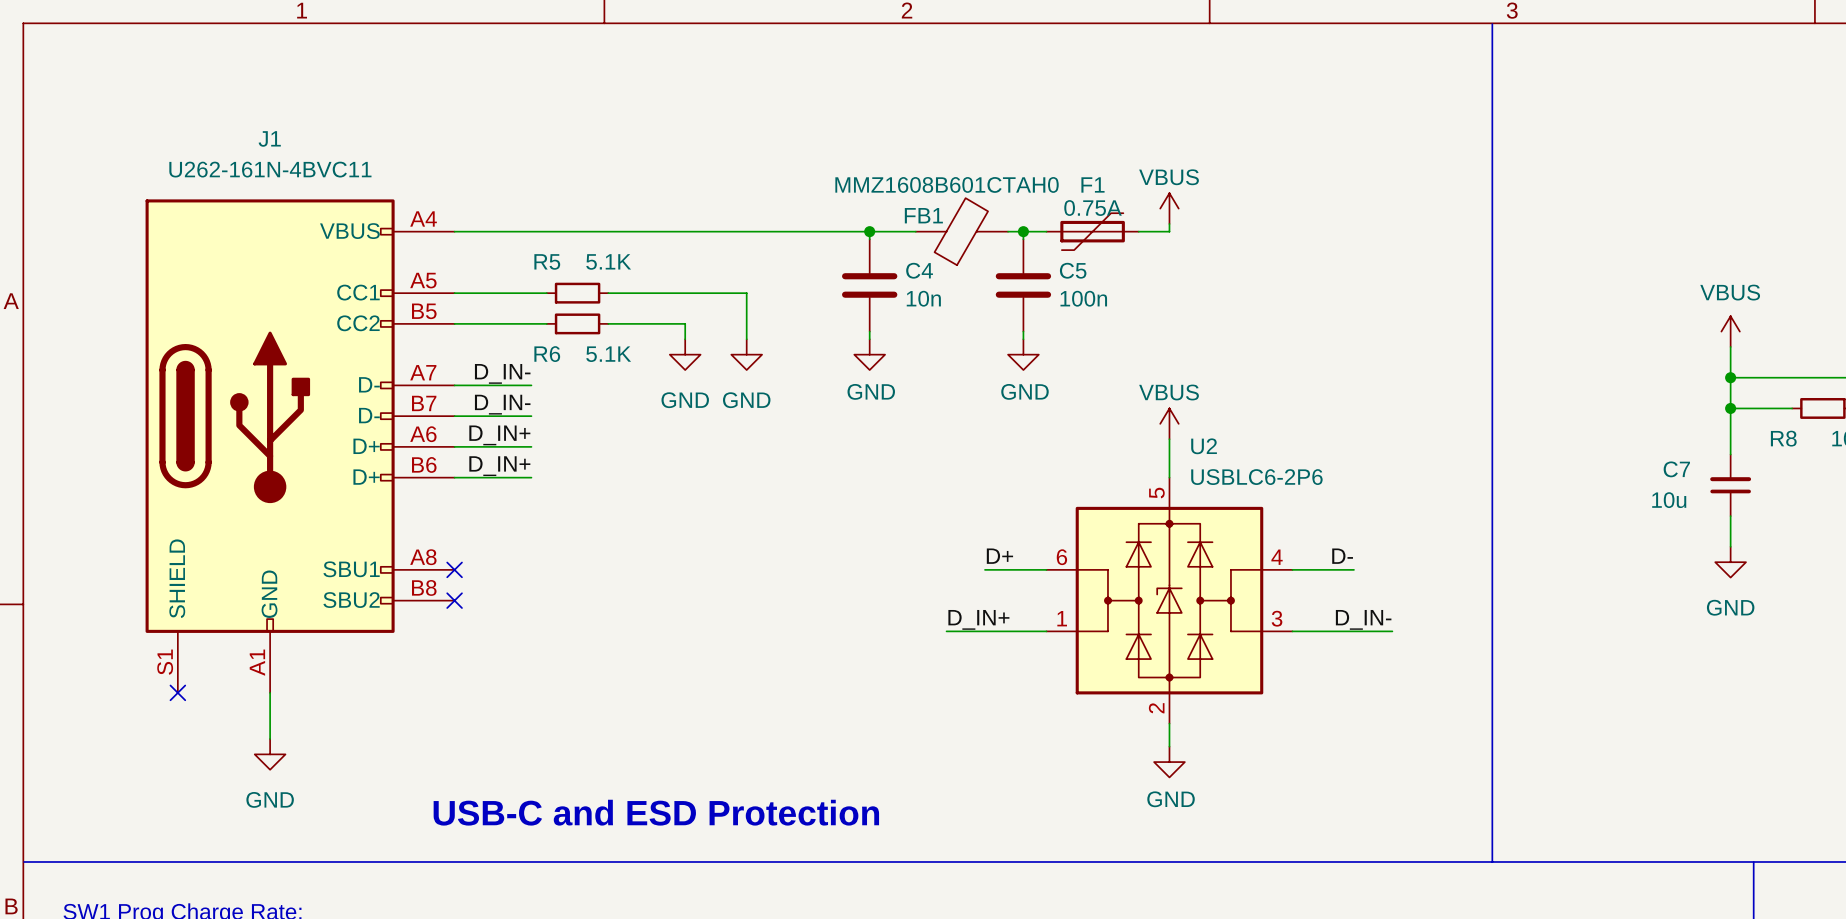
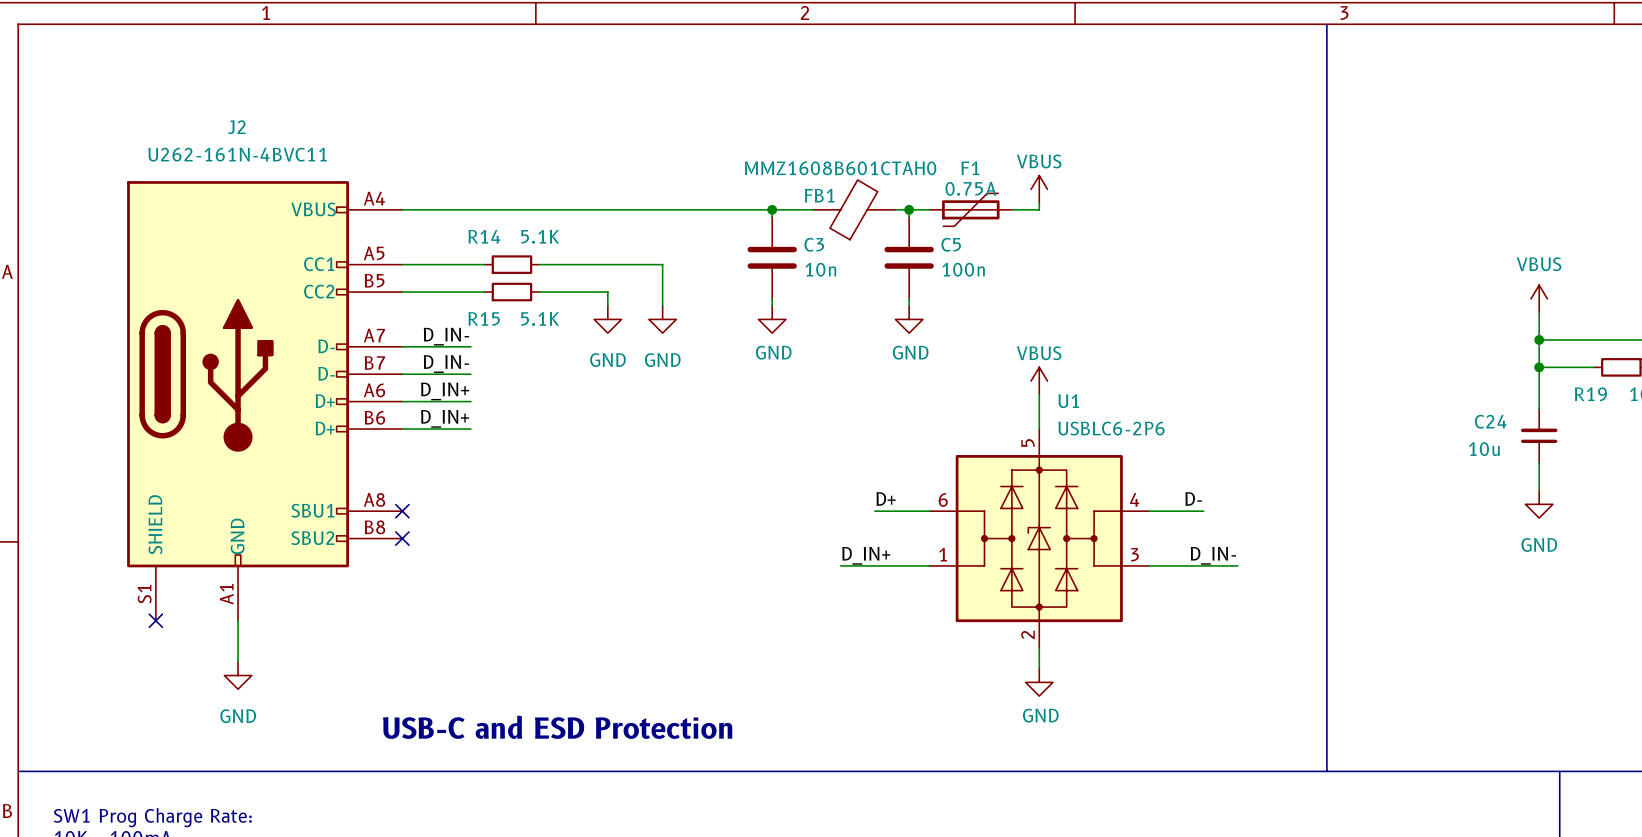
J1 name: J1 (269, 138) -> J2 (236, 127)
R5 name: R5 (547, 261) -> R14 (484, 236)
C4 name: C4 (919, 270) -> C3 (814, 244)
R6 name: R6 (547, 354) -> R15 (484, 318)
R8 name: R8 (1783, 438) -> R19 (1590, 394)
U2 name: U2 (1204, 446) -> U1 (1068, 401)
C7 name: C7 (1676, 469) -> C24 (1490, 421)

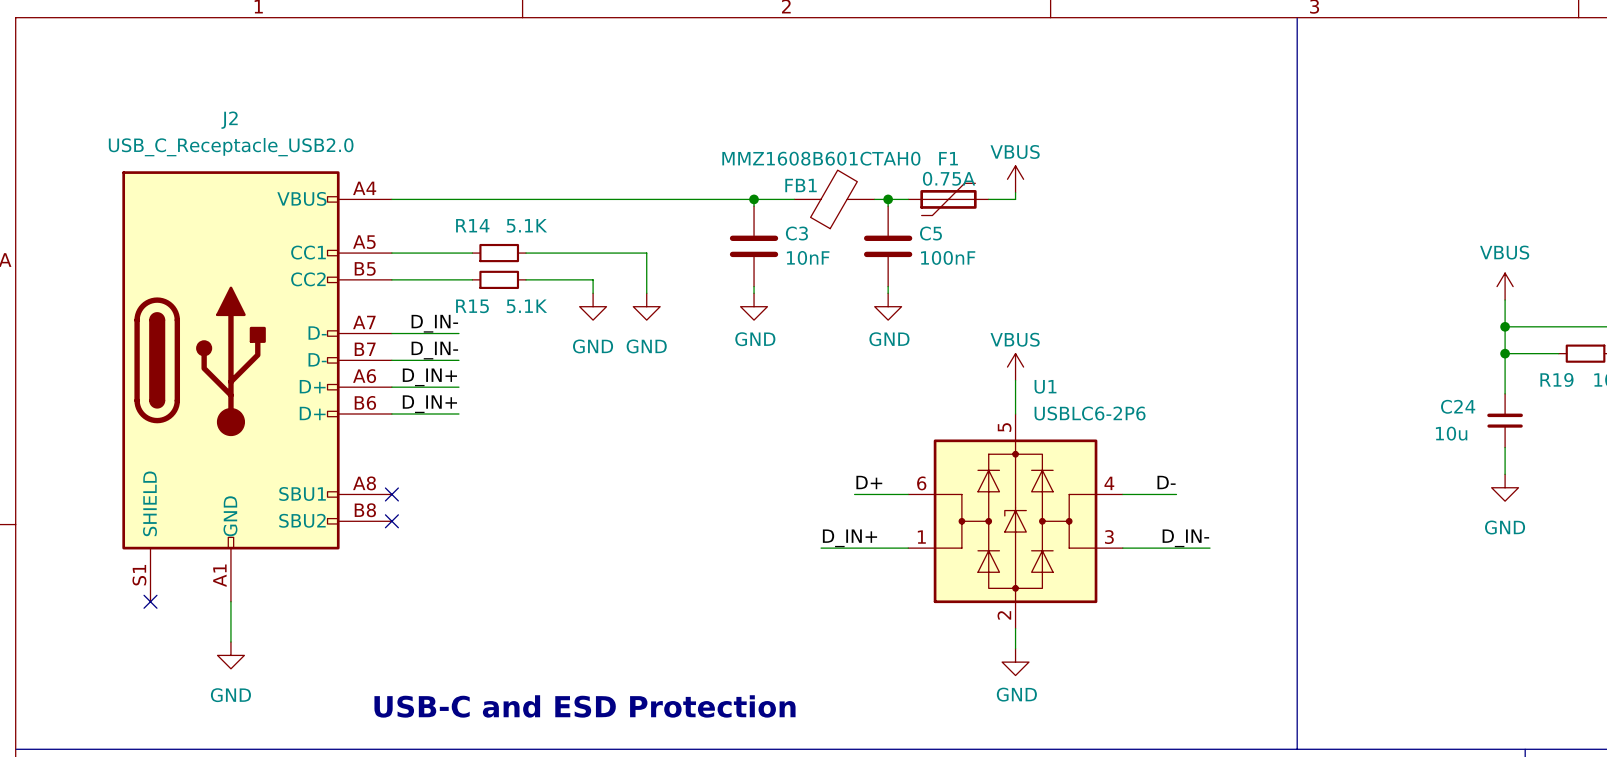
J2 value: U262-161N-4BVC11 (237, 154) -> USB_C_Receptacle_USB2.0 (231, 147)
C3 value: 10n (820, 269) -> 10nF (808, 257)
C5 value: 100n (963, 269) -> 100nF (948, 257)

